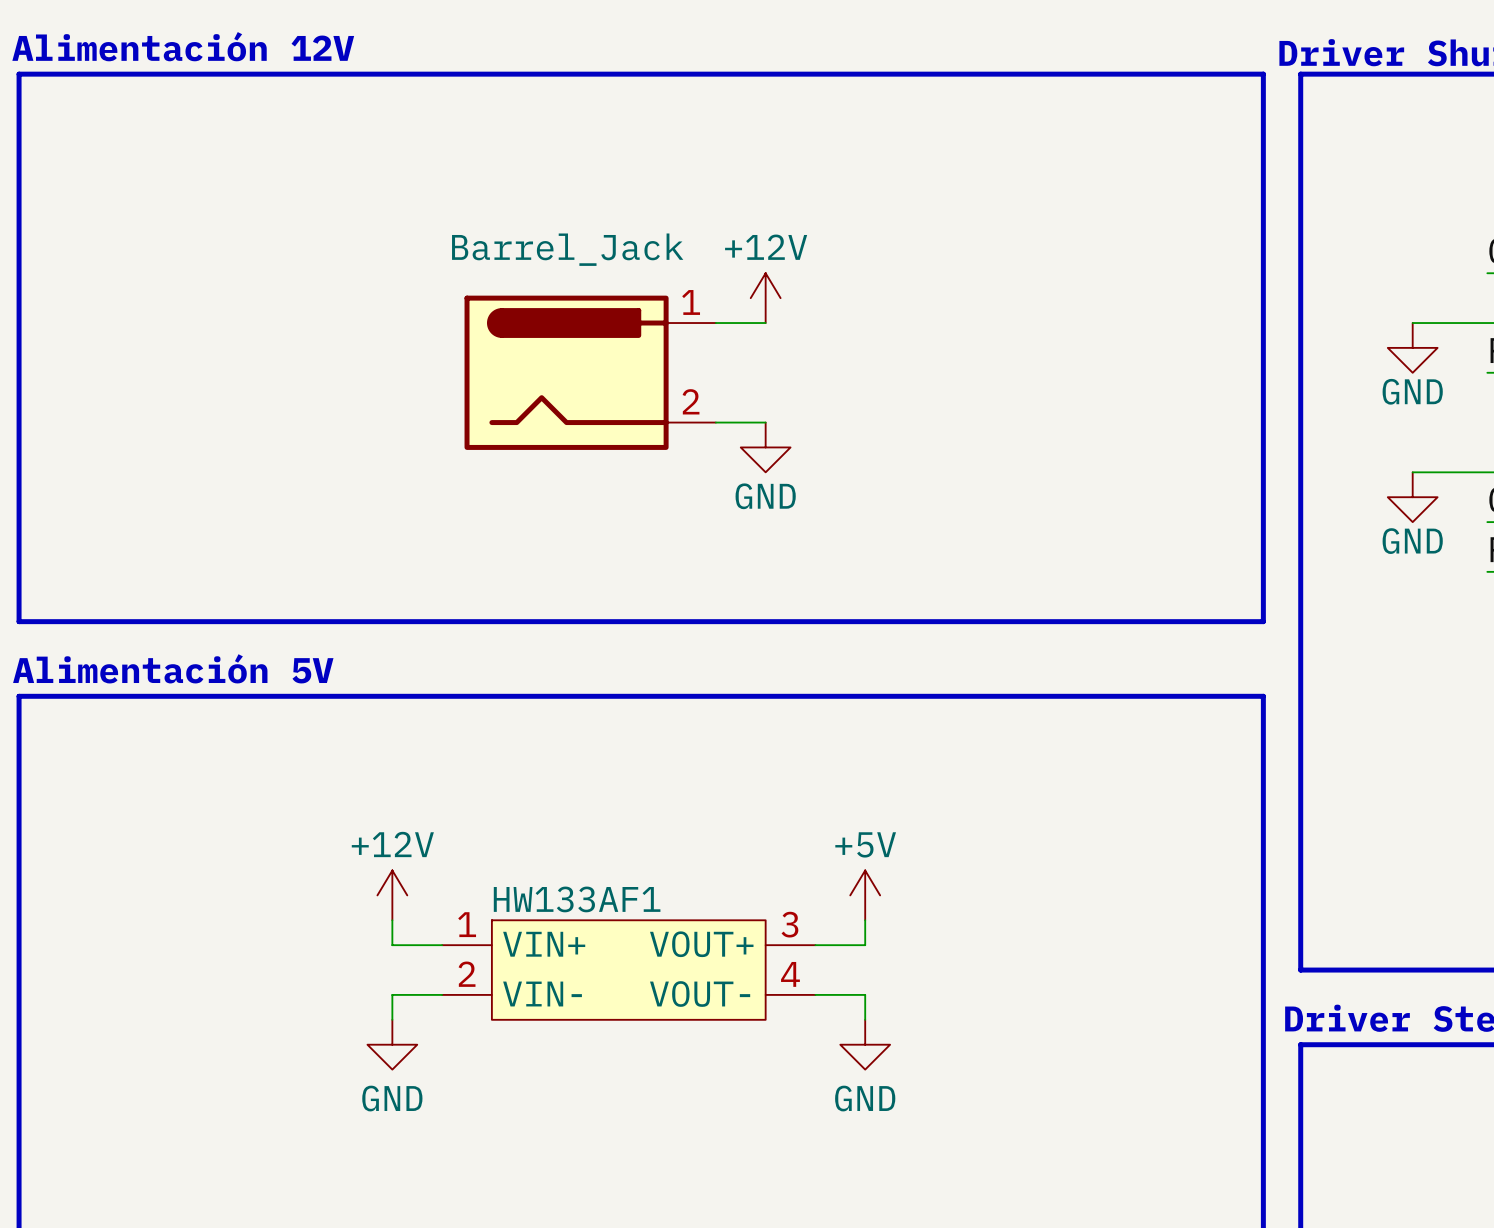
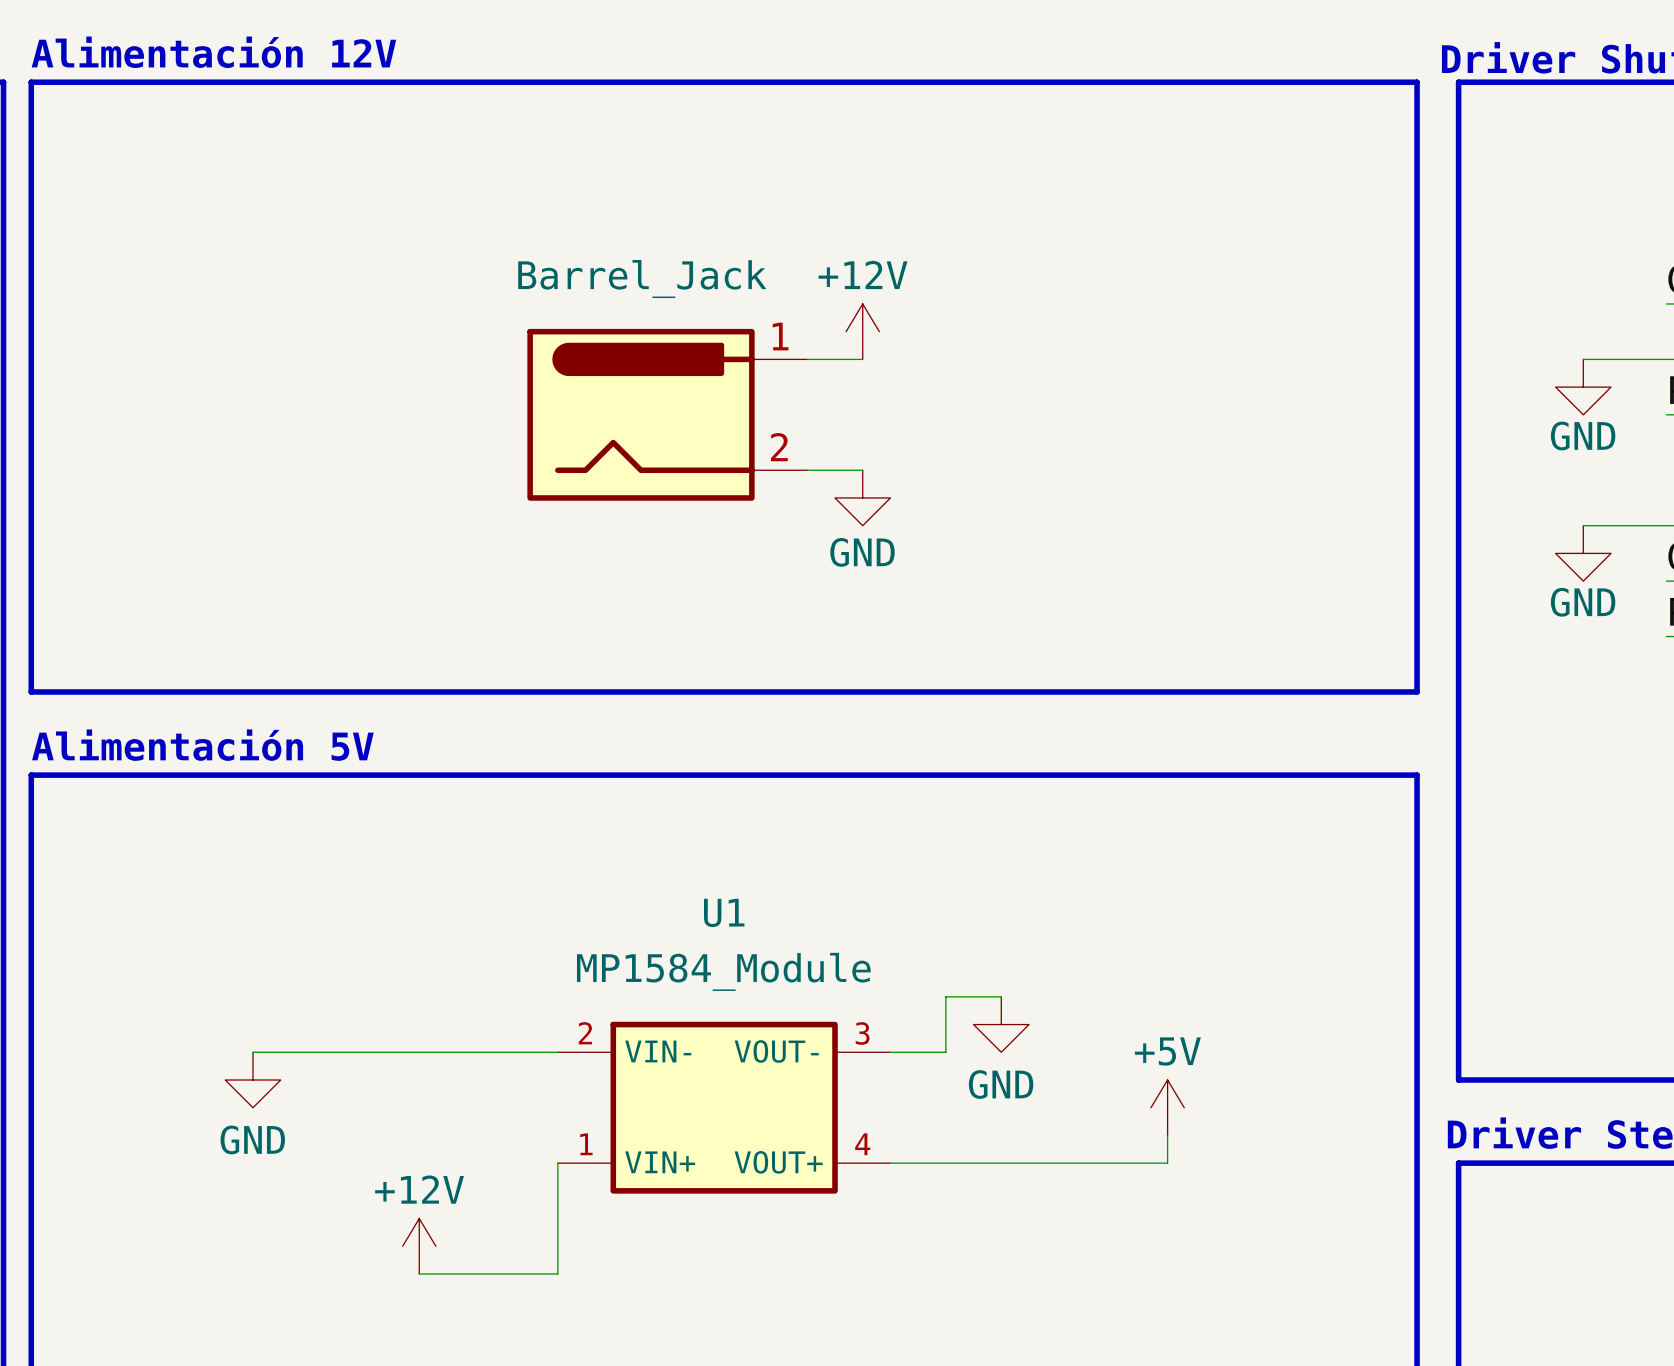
power symbol position: +12V (392, 895) -> +12V (419, 1246)
power symbol position: +5V (865, 895) -> +5V (1167, 1107)
wire: (392, 920) (392, 945) -> (252, 1052) (446, 1052)
wire: (865, 920) (865, 945) (840, 945) -> (1001, 996) (945, 996) (945, 1052)
HW133AF1: (628, 970) -> none
wire: (442, 994) (392, 994) (392, 1019) -> none
U1: none -> MP1584_Module (724, 1107)
wire: (815, 994) (865, 994) (865, 1019) -> none
wire: none -> (1167, 1135) (1167, 1163) (890, 1163)
power symbol position: GND (392, 1044) -> GND (252, 1080)
wire: none -> (557, 1163) (557, 1274) (419, 1274)
power symbol position: GND (865, 1044) -> GND (1001, 1024)

